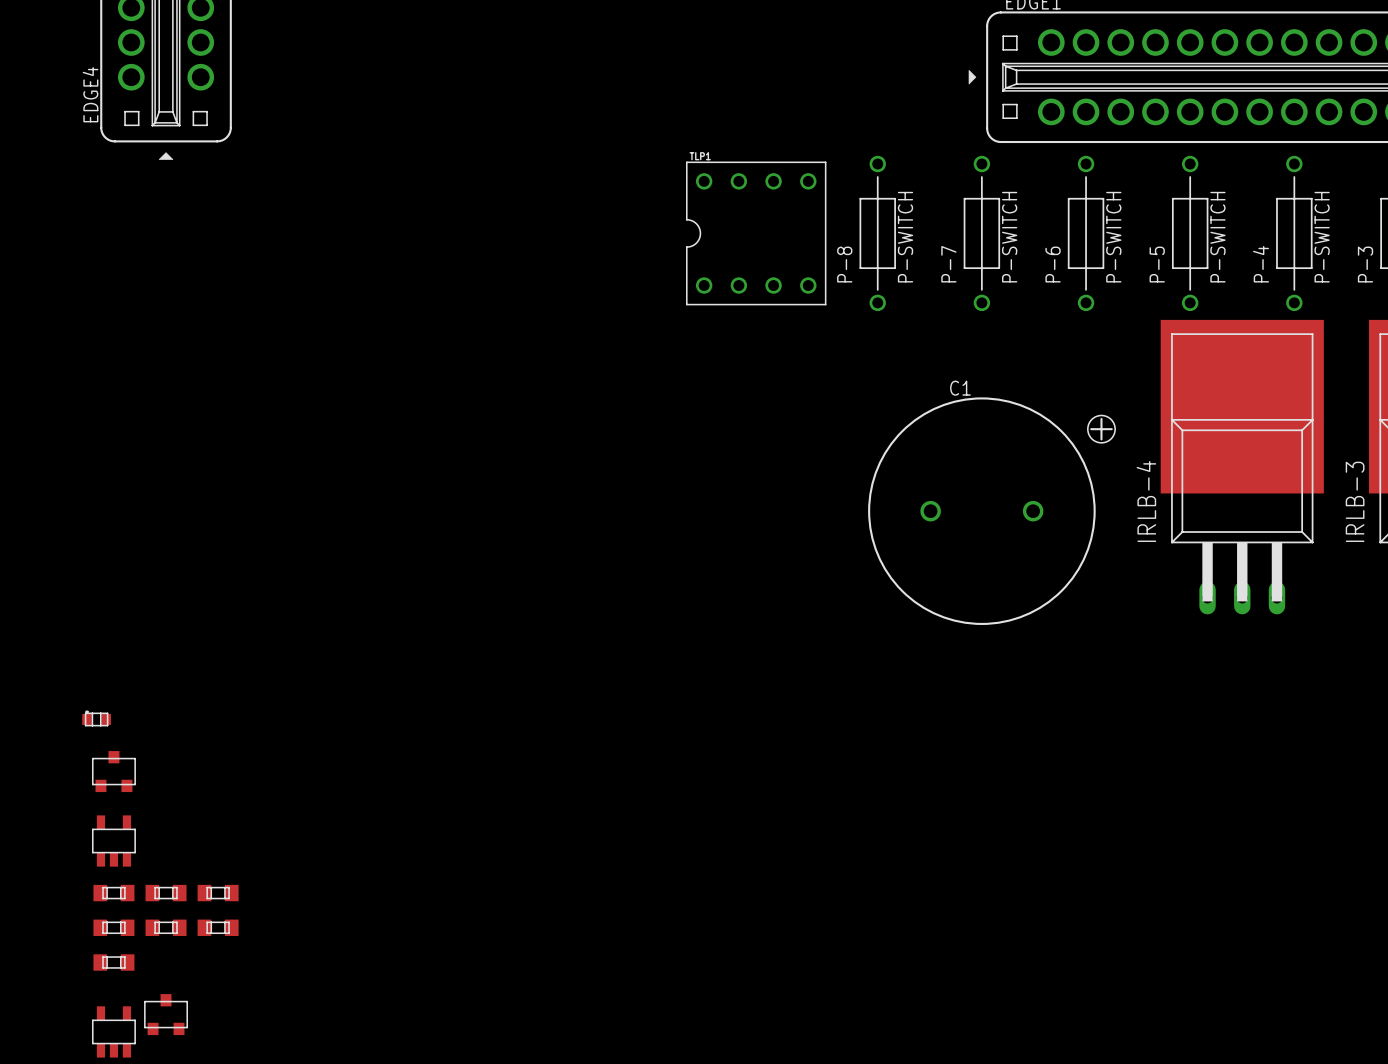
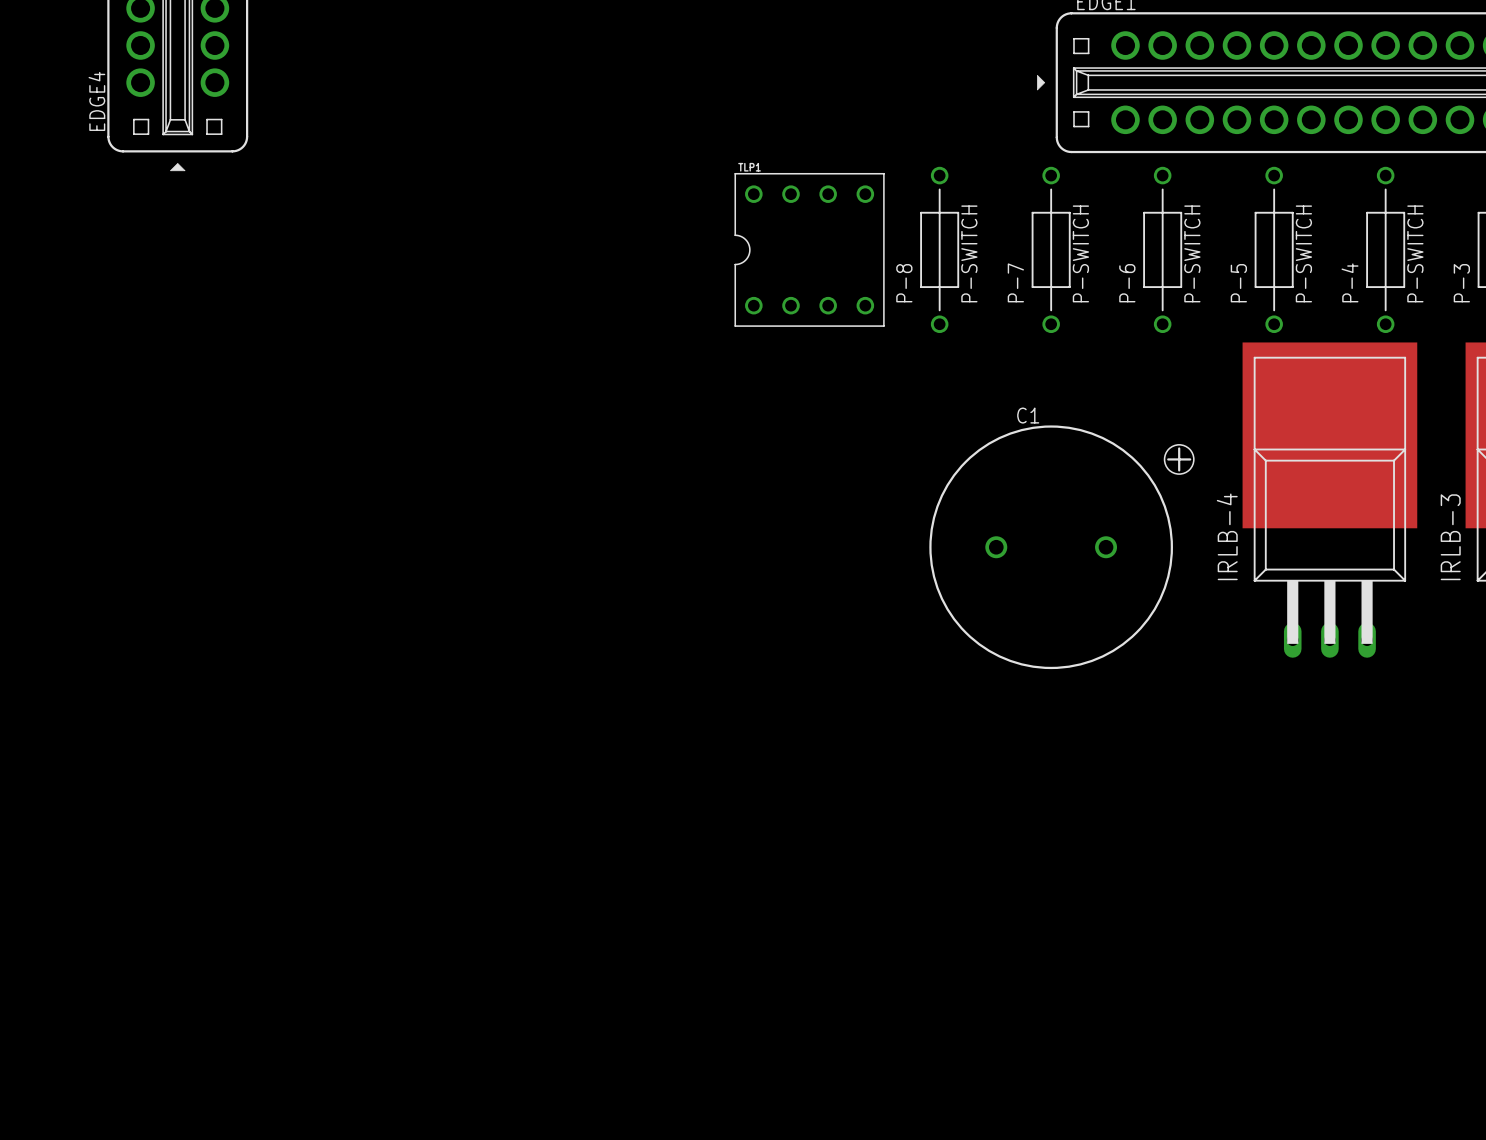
part: (96, 719) -> none
part: (113, 771) -> none
part: (113, 840) -> none
part: (113, 893) -> none
part: (166, 893) -> none
part: (218, 893) -> none
part: (113, 927) -> none
part: (166, 927) -> none
part: (218, 927) -> none
part: (113, 962) -> none
part: (166, 1014) -> none
part: (113, 1031) -> none

